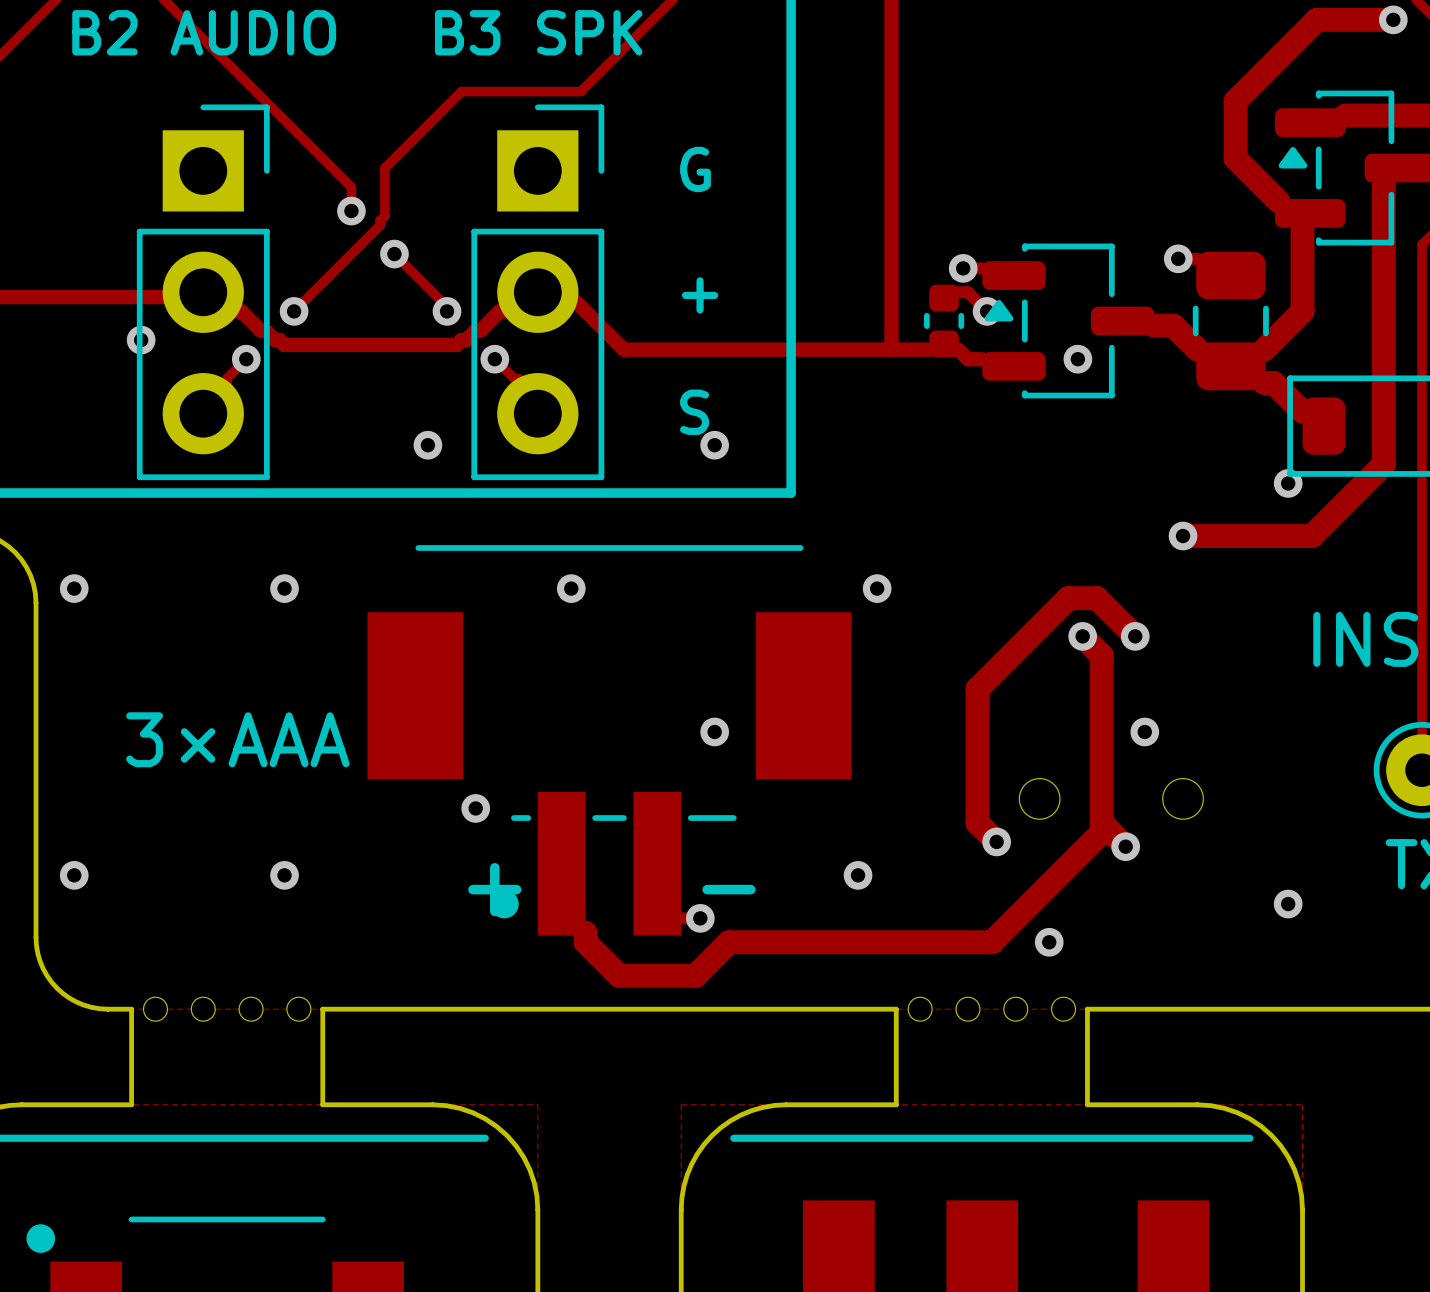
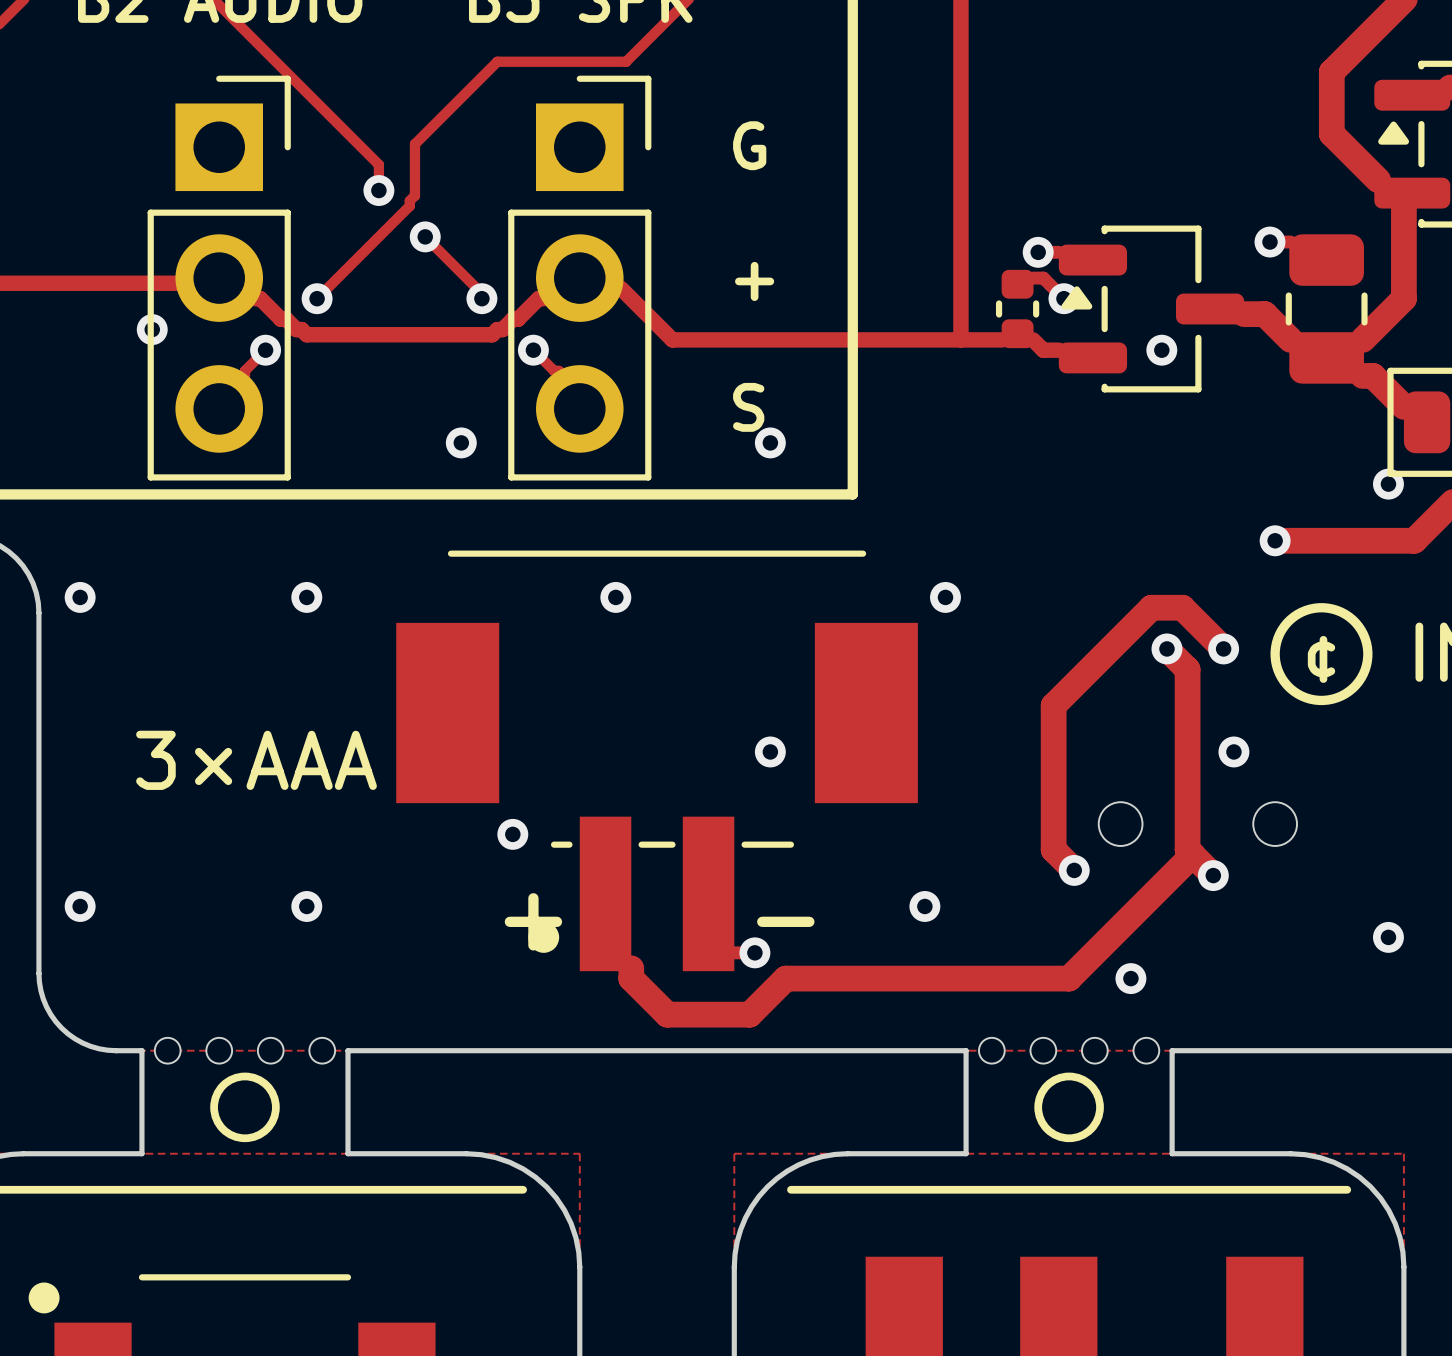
drawing: none -> [1270, 603, 1373, 706]
text: none -> ¢ (1321, 659)
drawing: none -> [210, 1072, 280, 1143]
drawing: none -> [1034, 1072, 1104, 1143]

